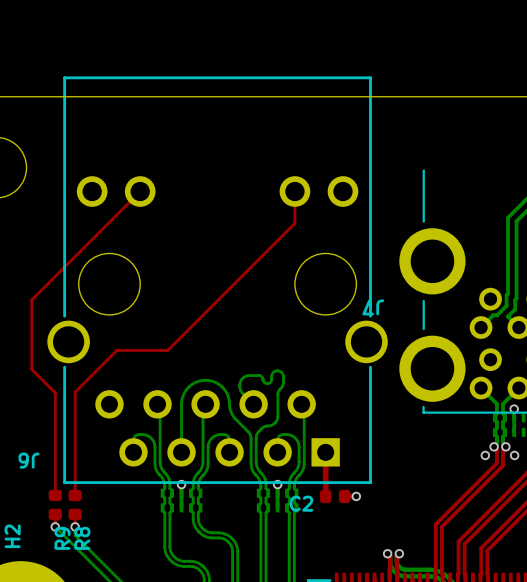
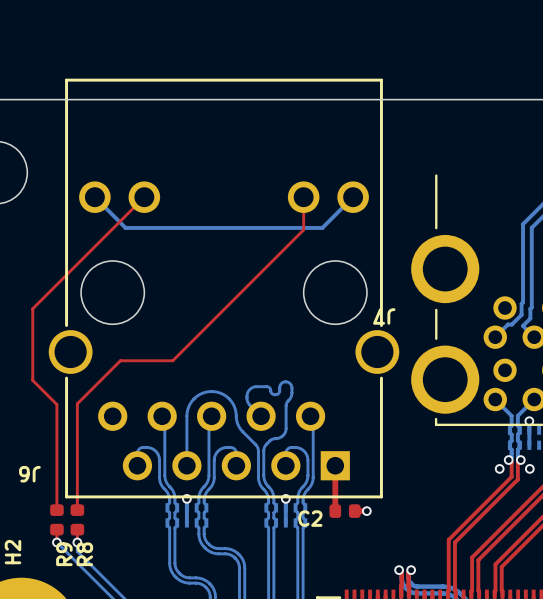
bottom track: none -> (94, 197) (125, 227) (322, 227) (353, 197)

